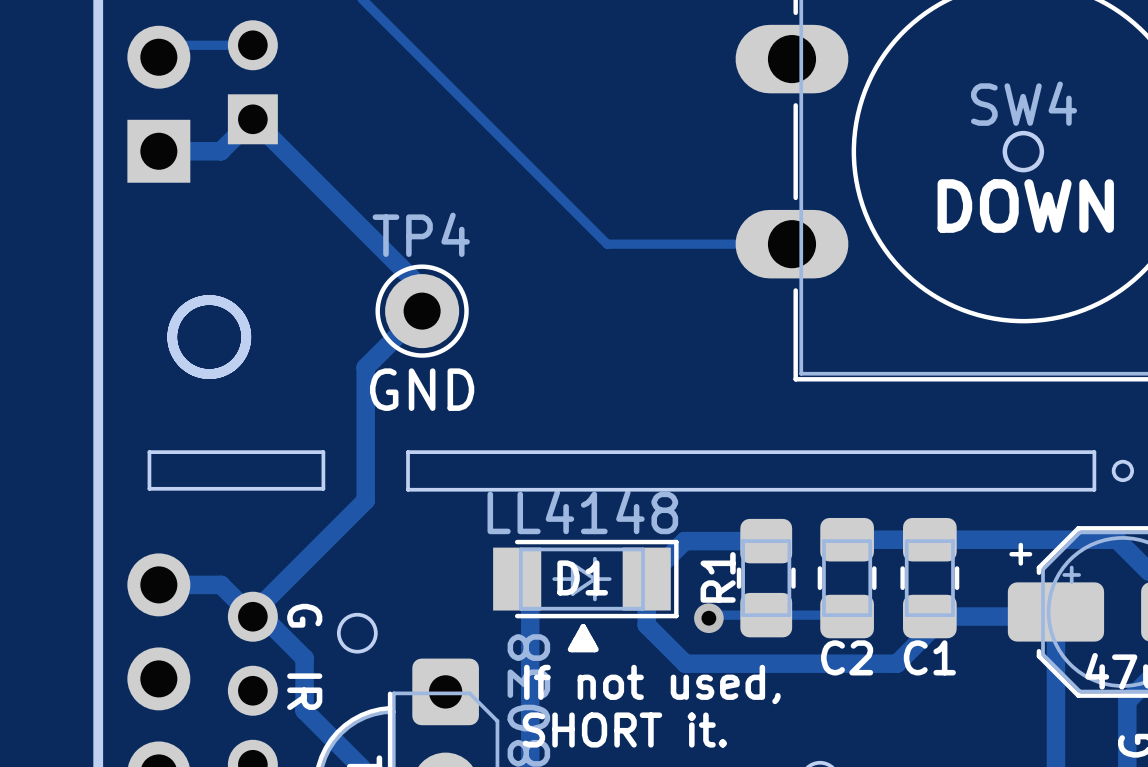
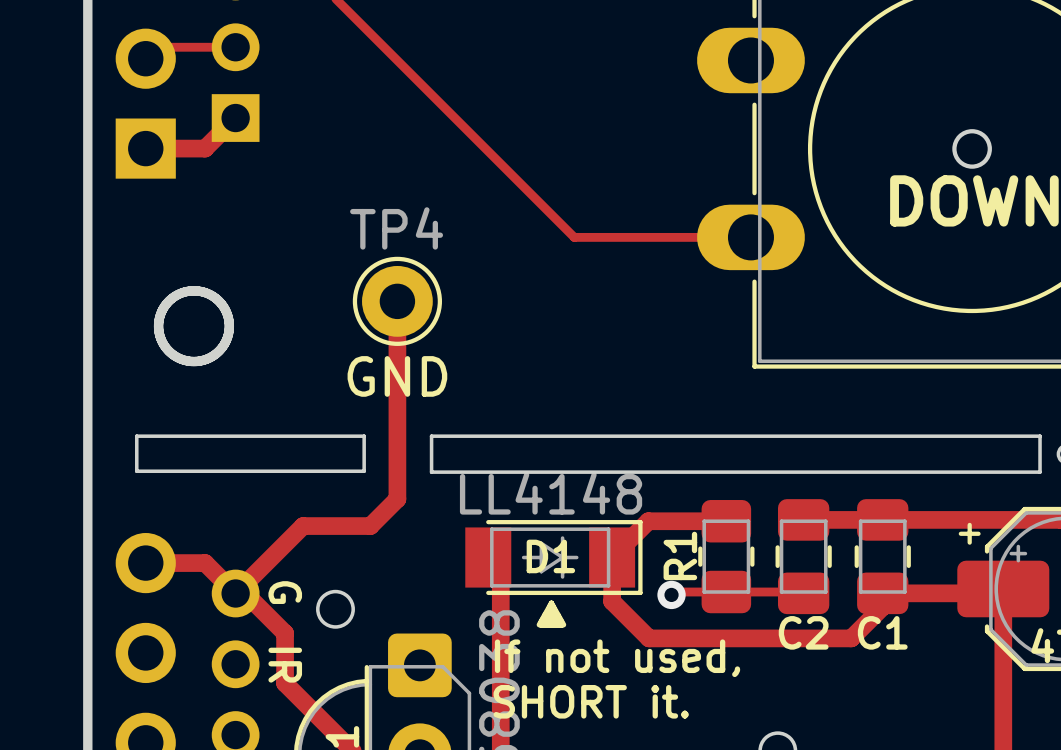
SW4 name: SW4 (1024, 103) -> none
track: (252, 119) (422, 288) (422, 311) (365, 367) (365, 500) (252, 613) (252, 616) -> (397, 301) (397, 499) (370, 526) (303, 526) (235, 593)
board edge: (323, 452) (323, 488) -> (303, 436) (364, 436) (364, 471) (303, 471)
board edge: (457, 452) (408, 452) (408, 489) (457, 489) -> (431, 436) (431, 472)

